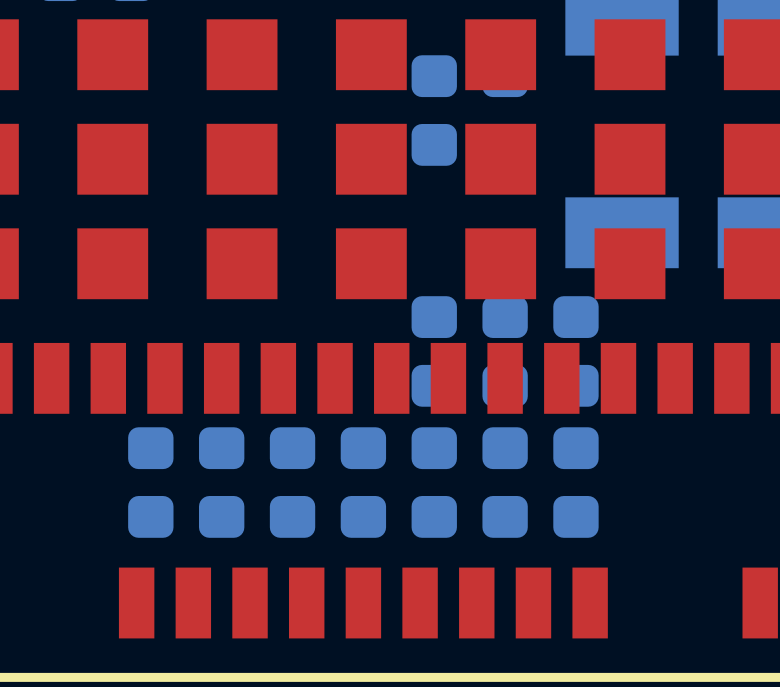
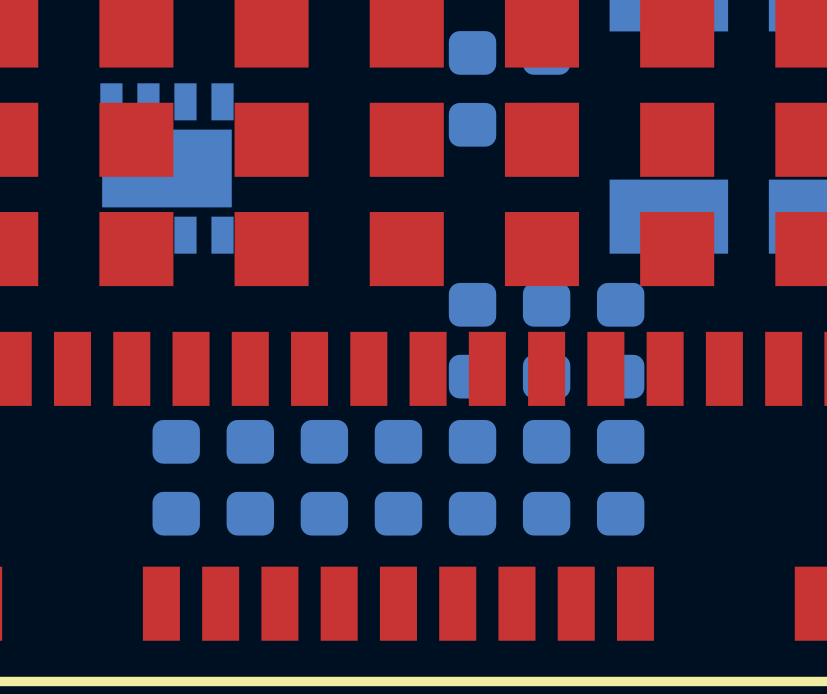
part: none -> (166, 168)

